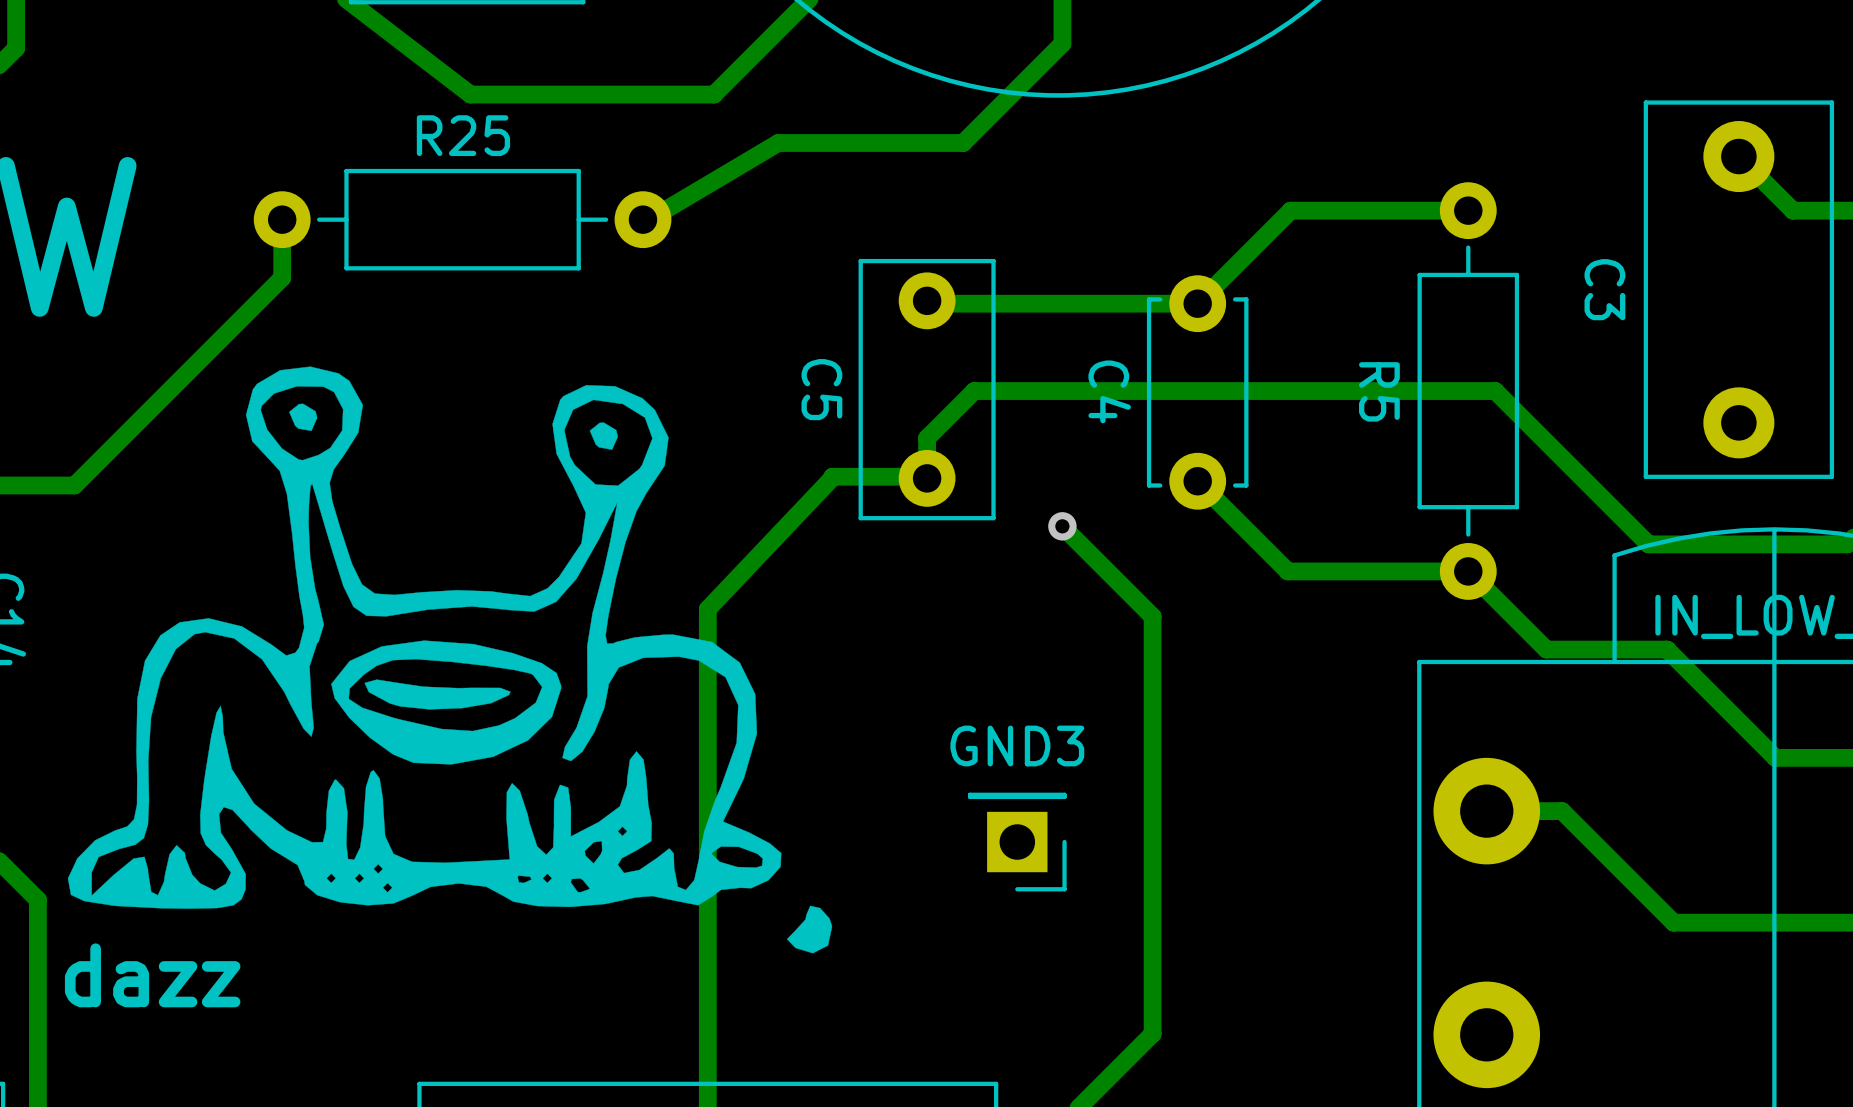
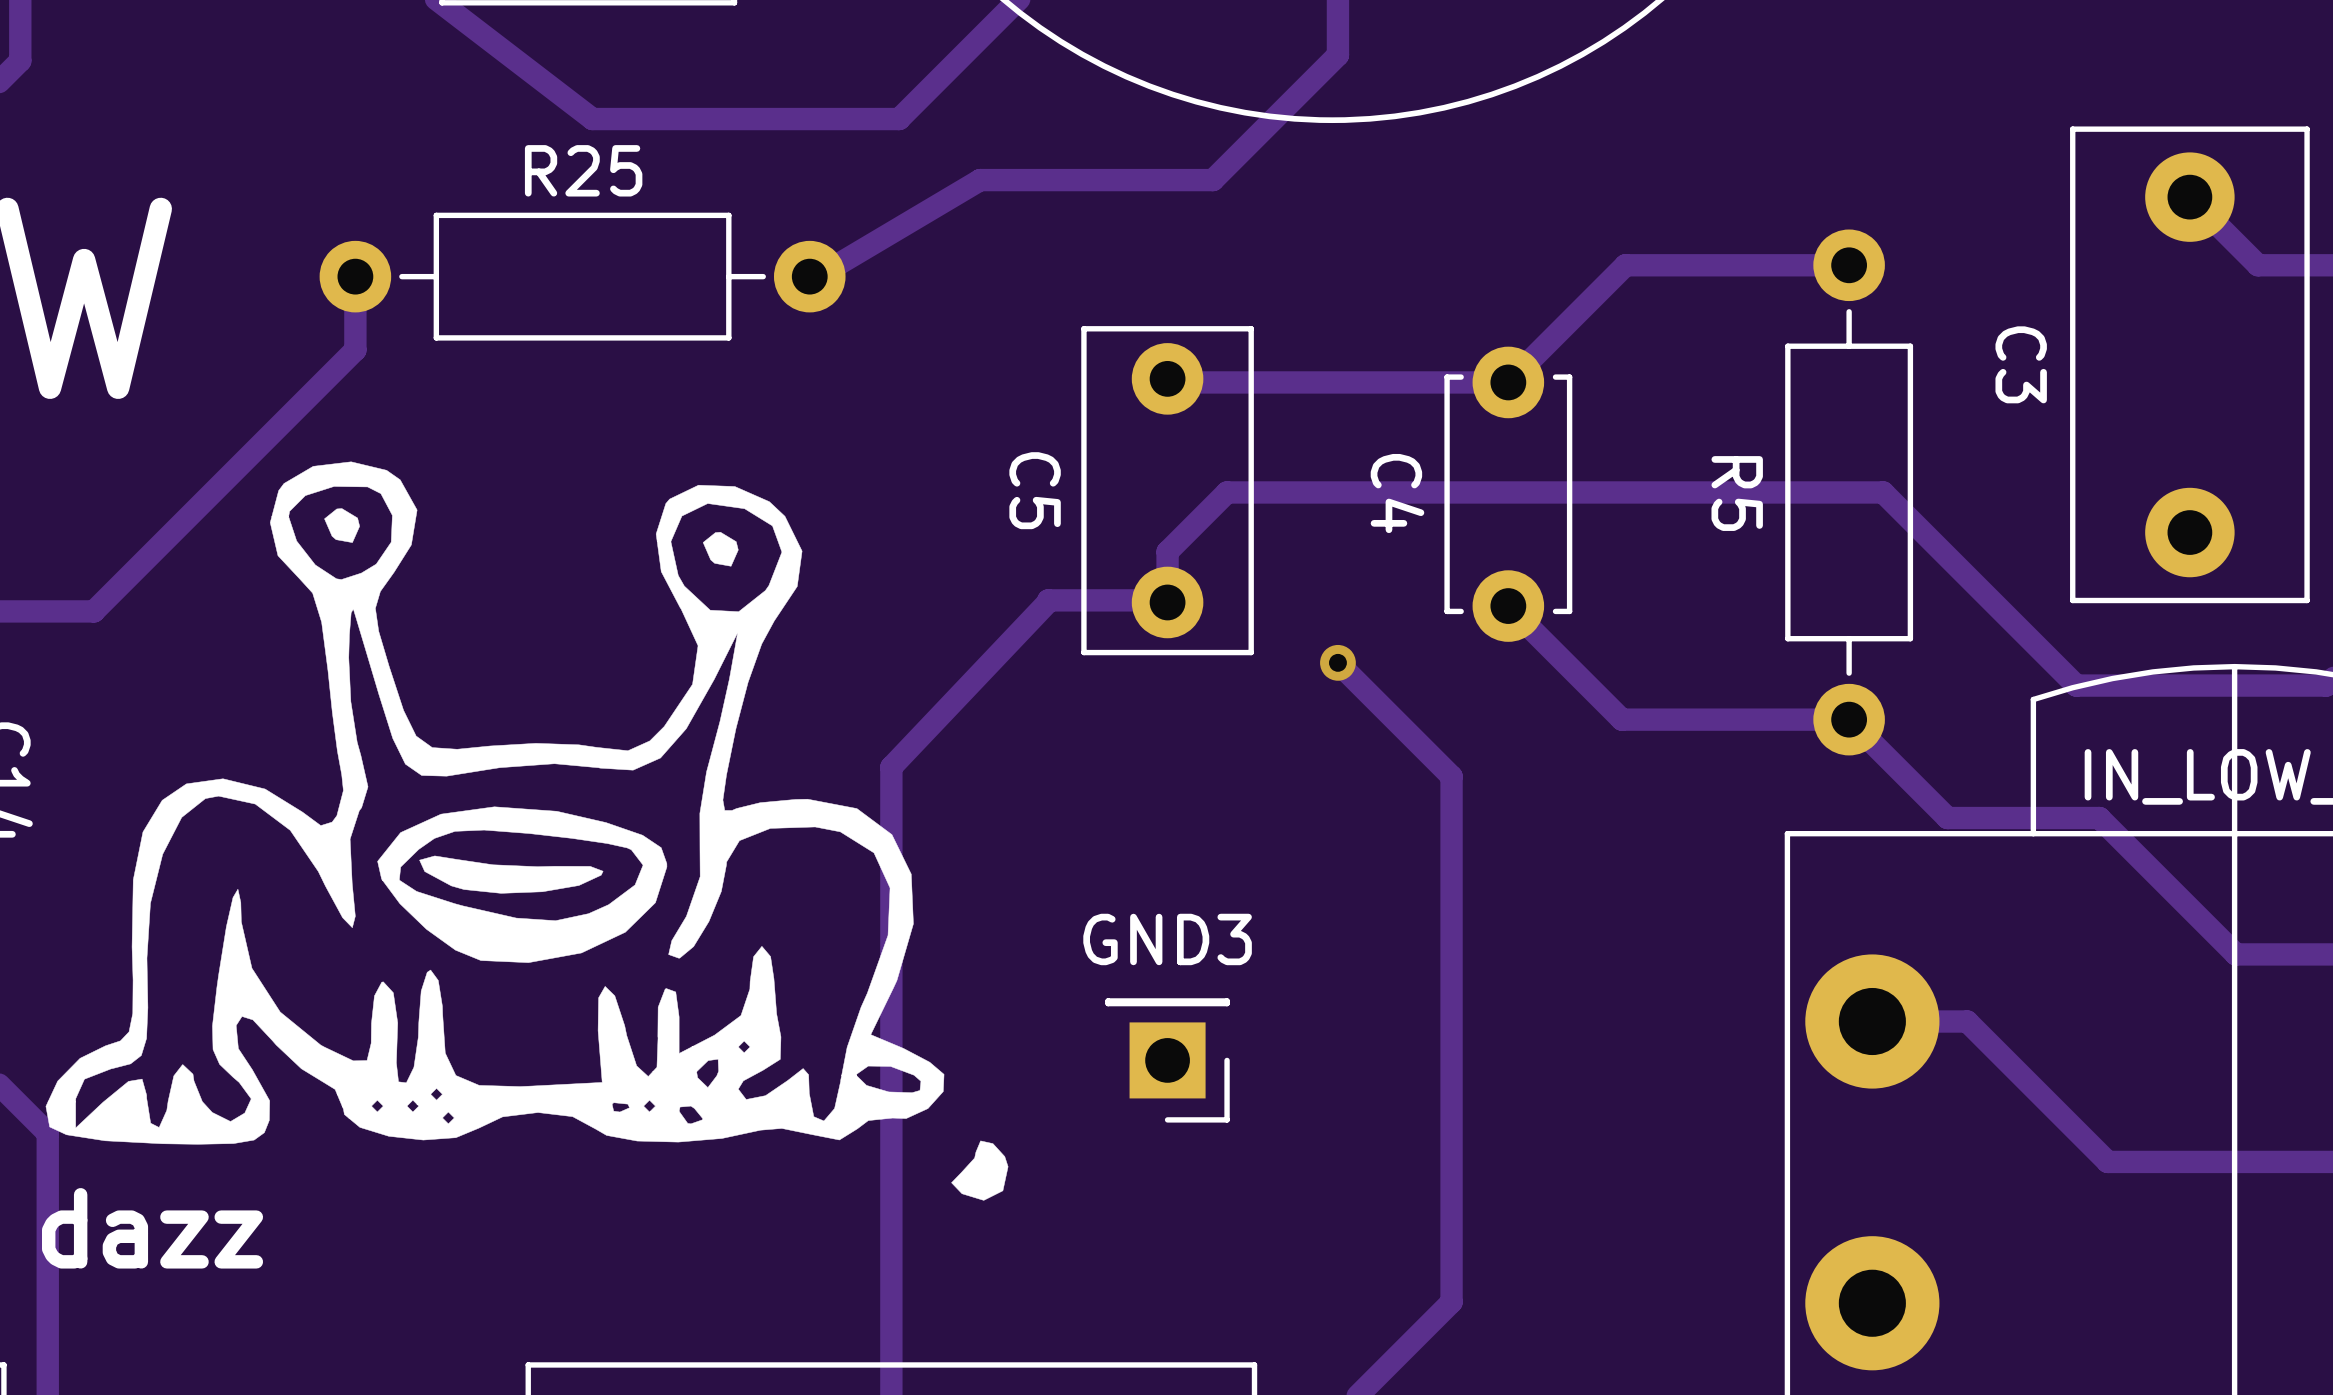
drawing position: (450, 659) -> (527, 831)
GND3 position: (1017, 842) -> (1167, 1060)
text position: dazz (152, 975) -> dazz (152, 1228)

